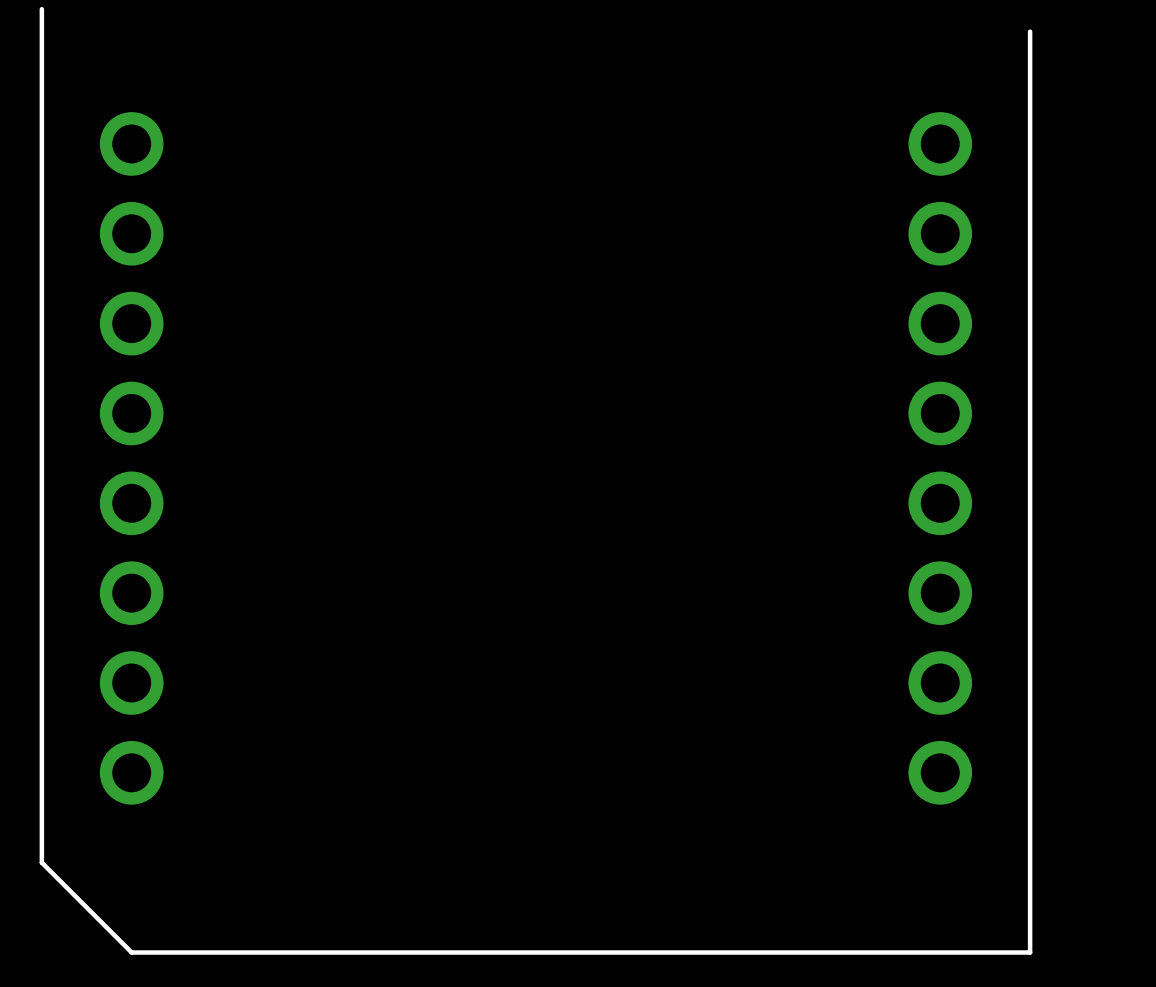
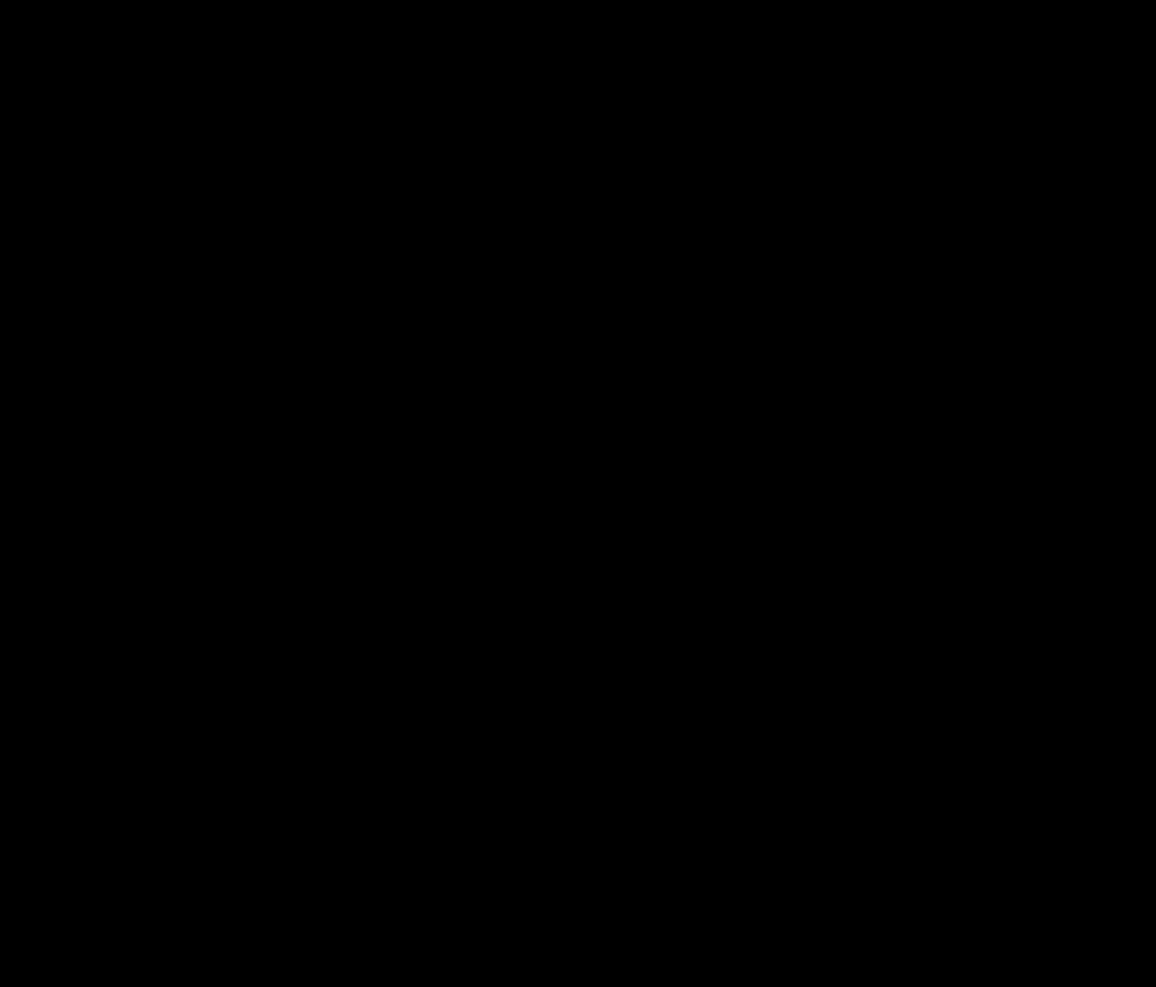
part: (535, 480) -> none

